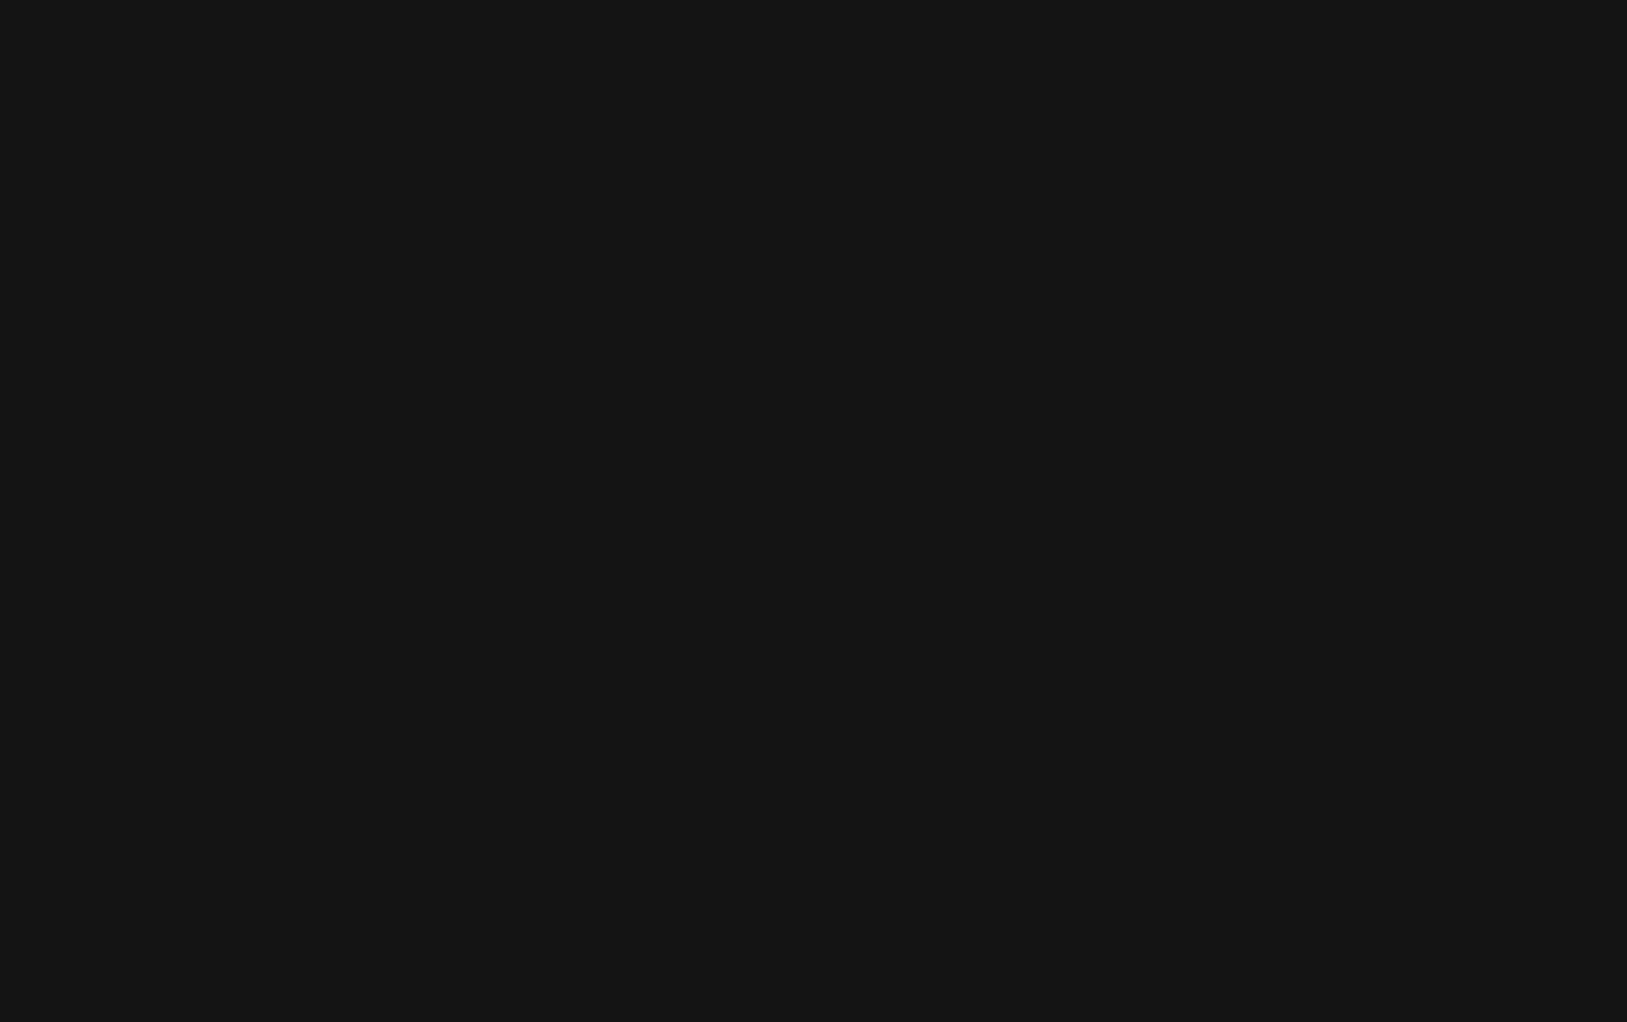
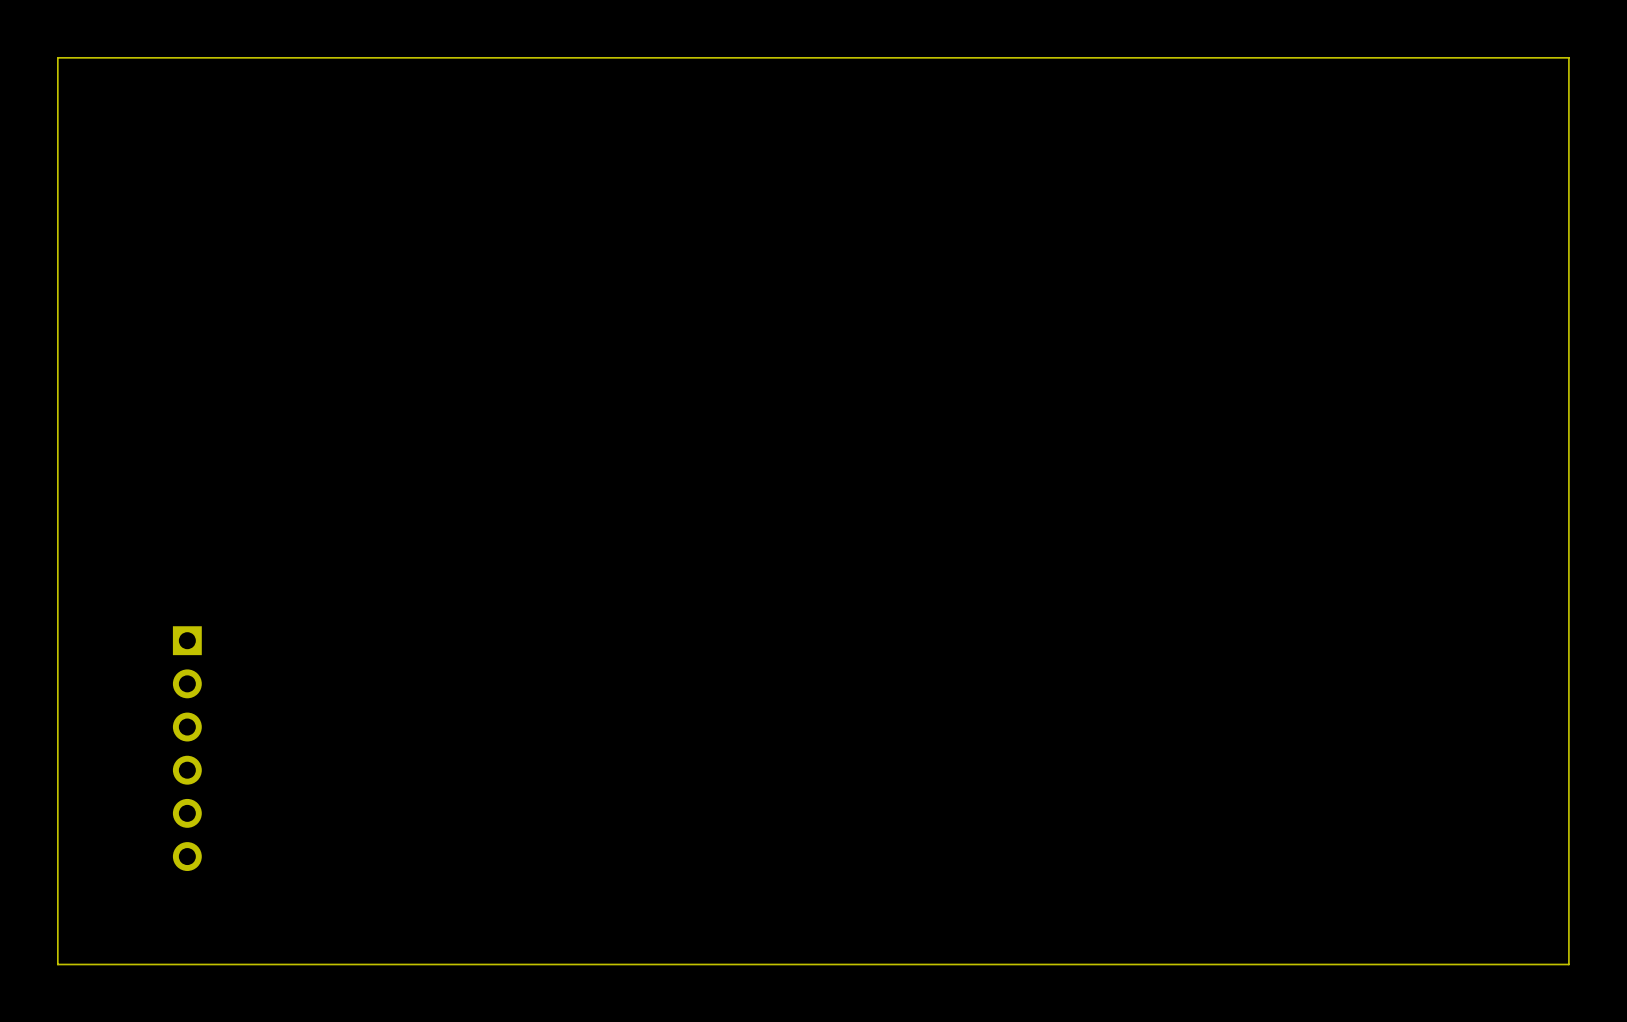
board edge: none -> (1568, 57) (57, 57) (57, 964) (1568, 964) (1568, 57)
part: none -> (187, 748)

